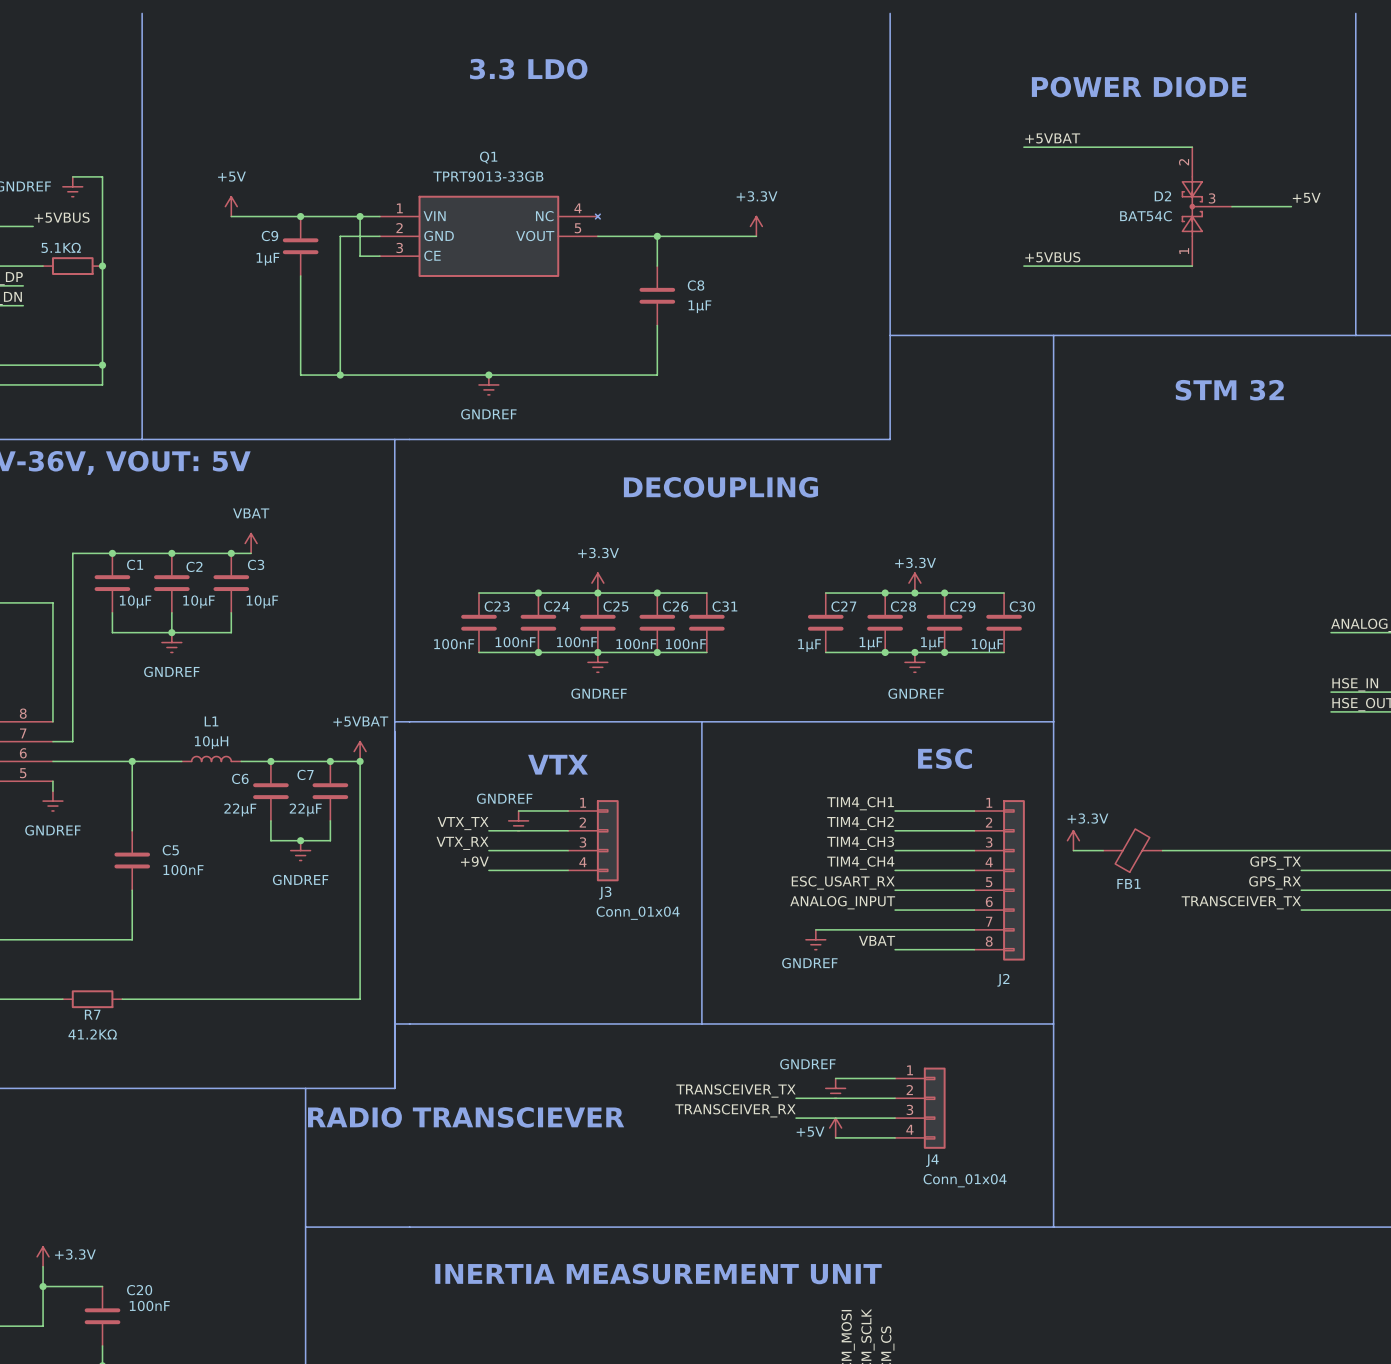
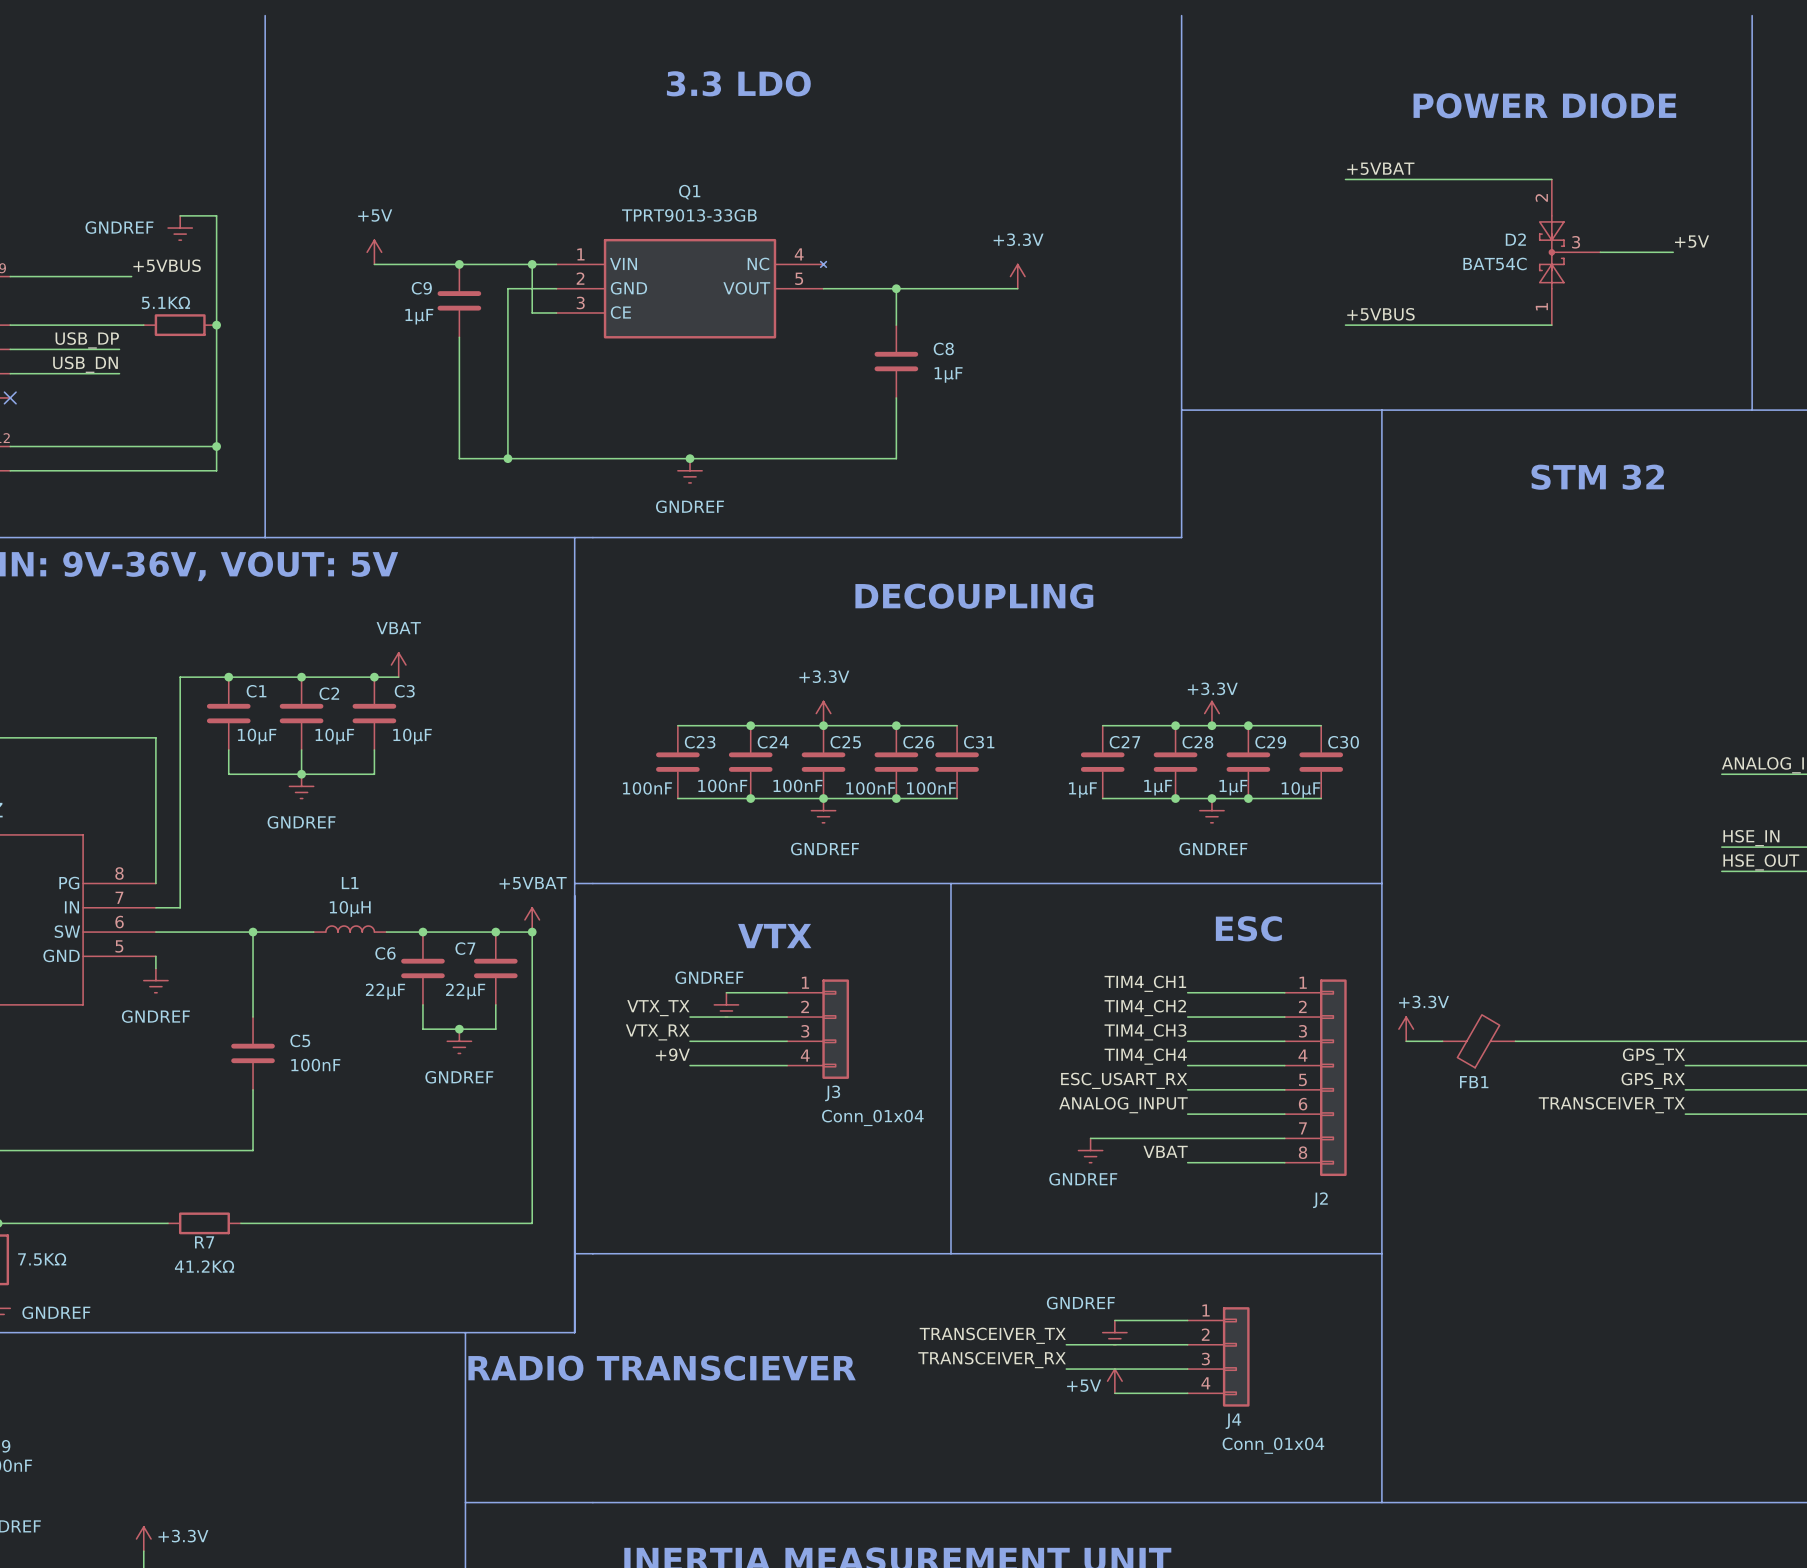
text position: POWER DIODE (1139, 87) -> POWER DIODE (1544, 105)

